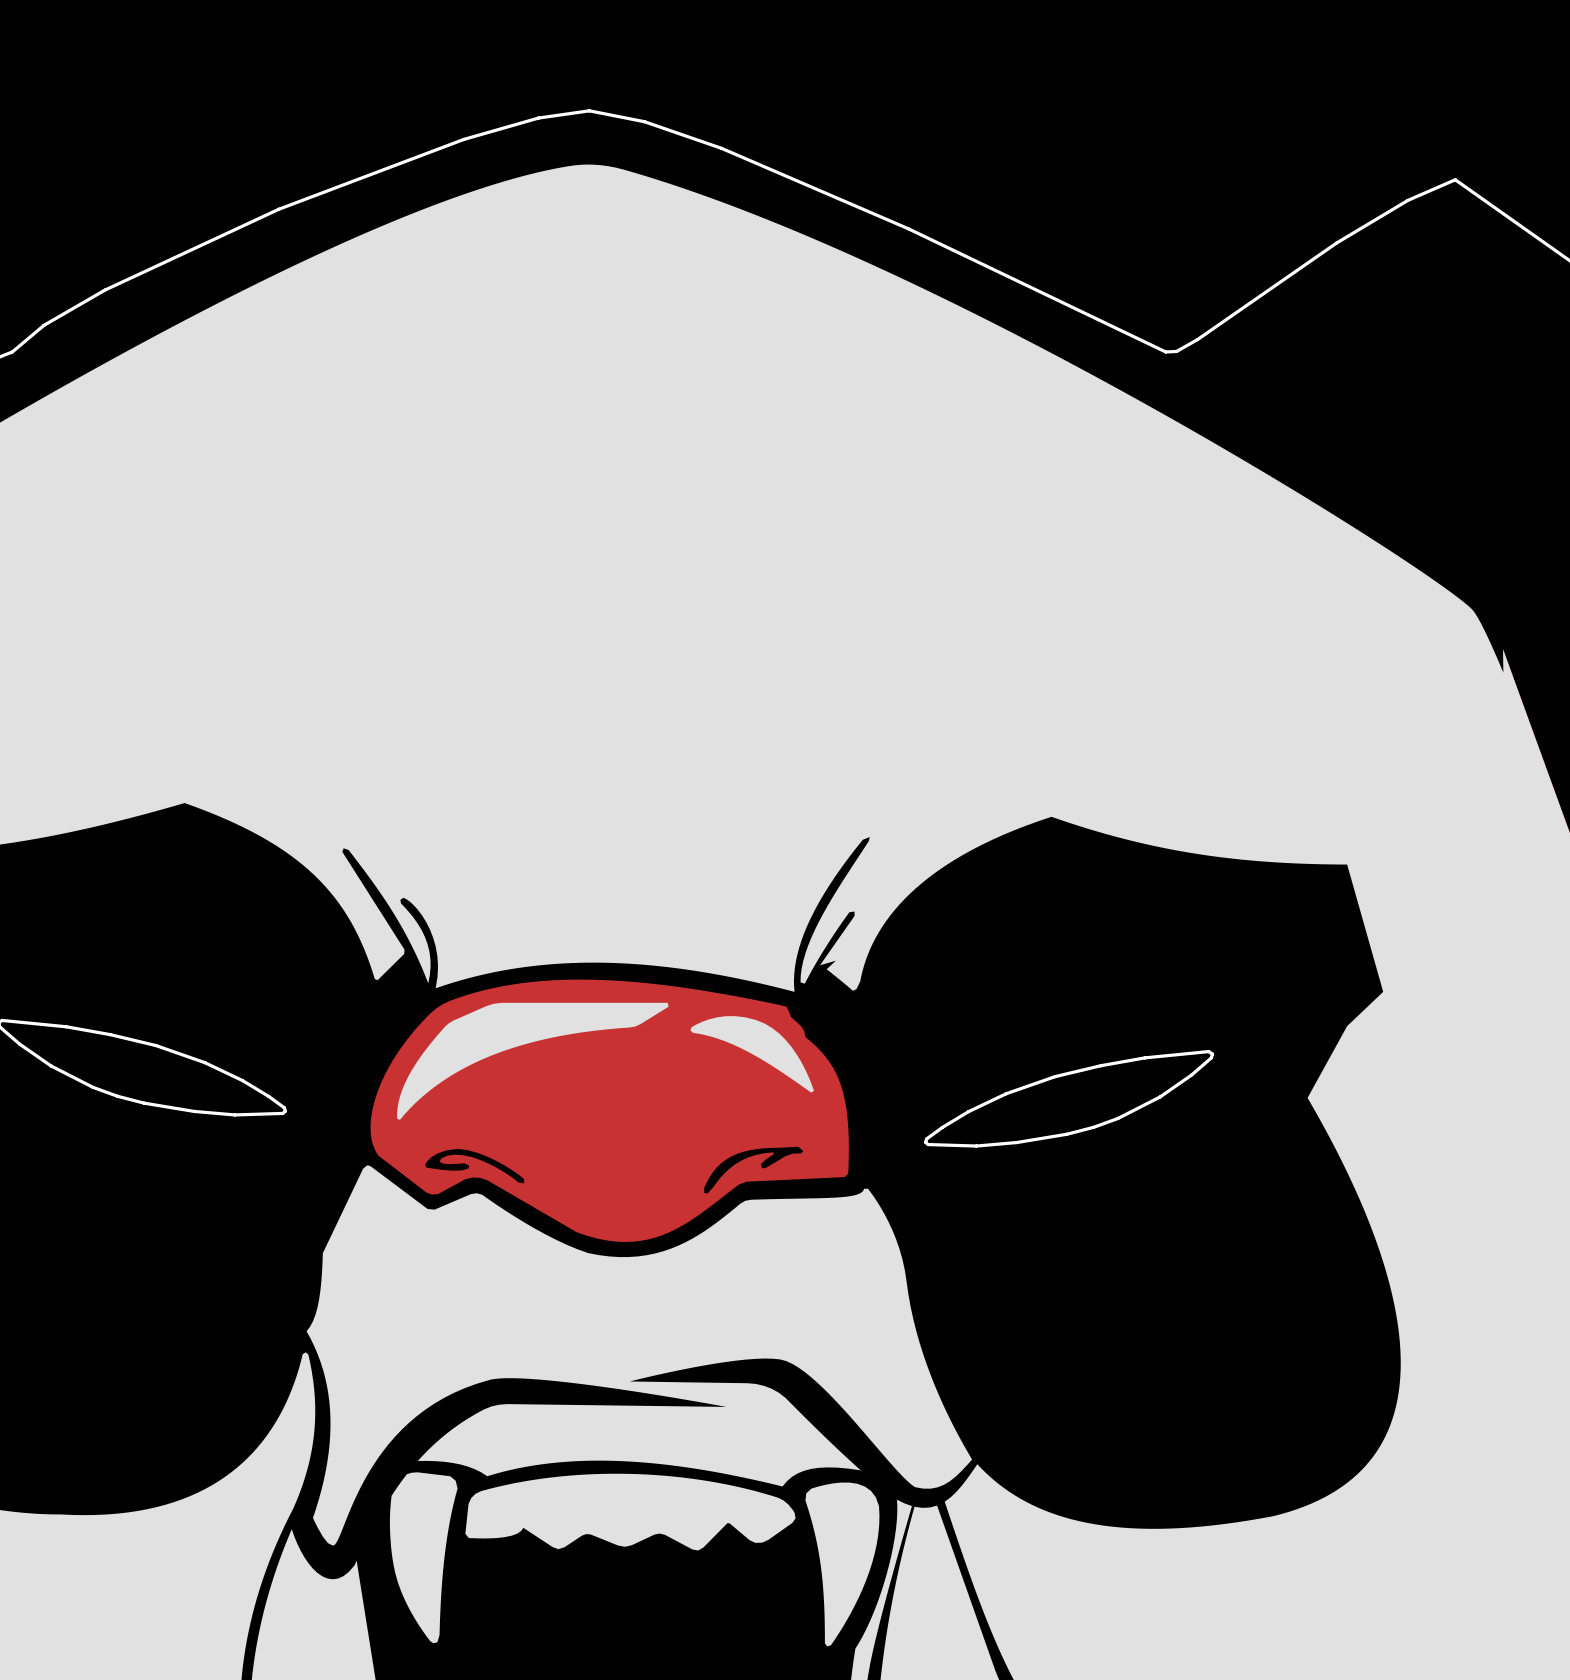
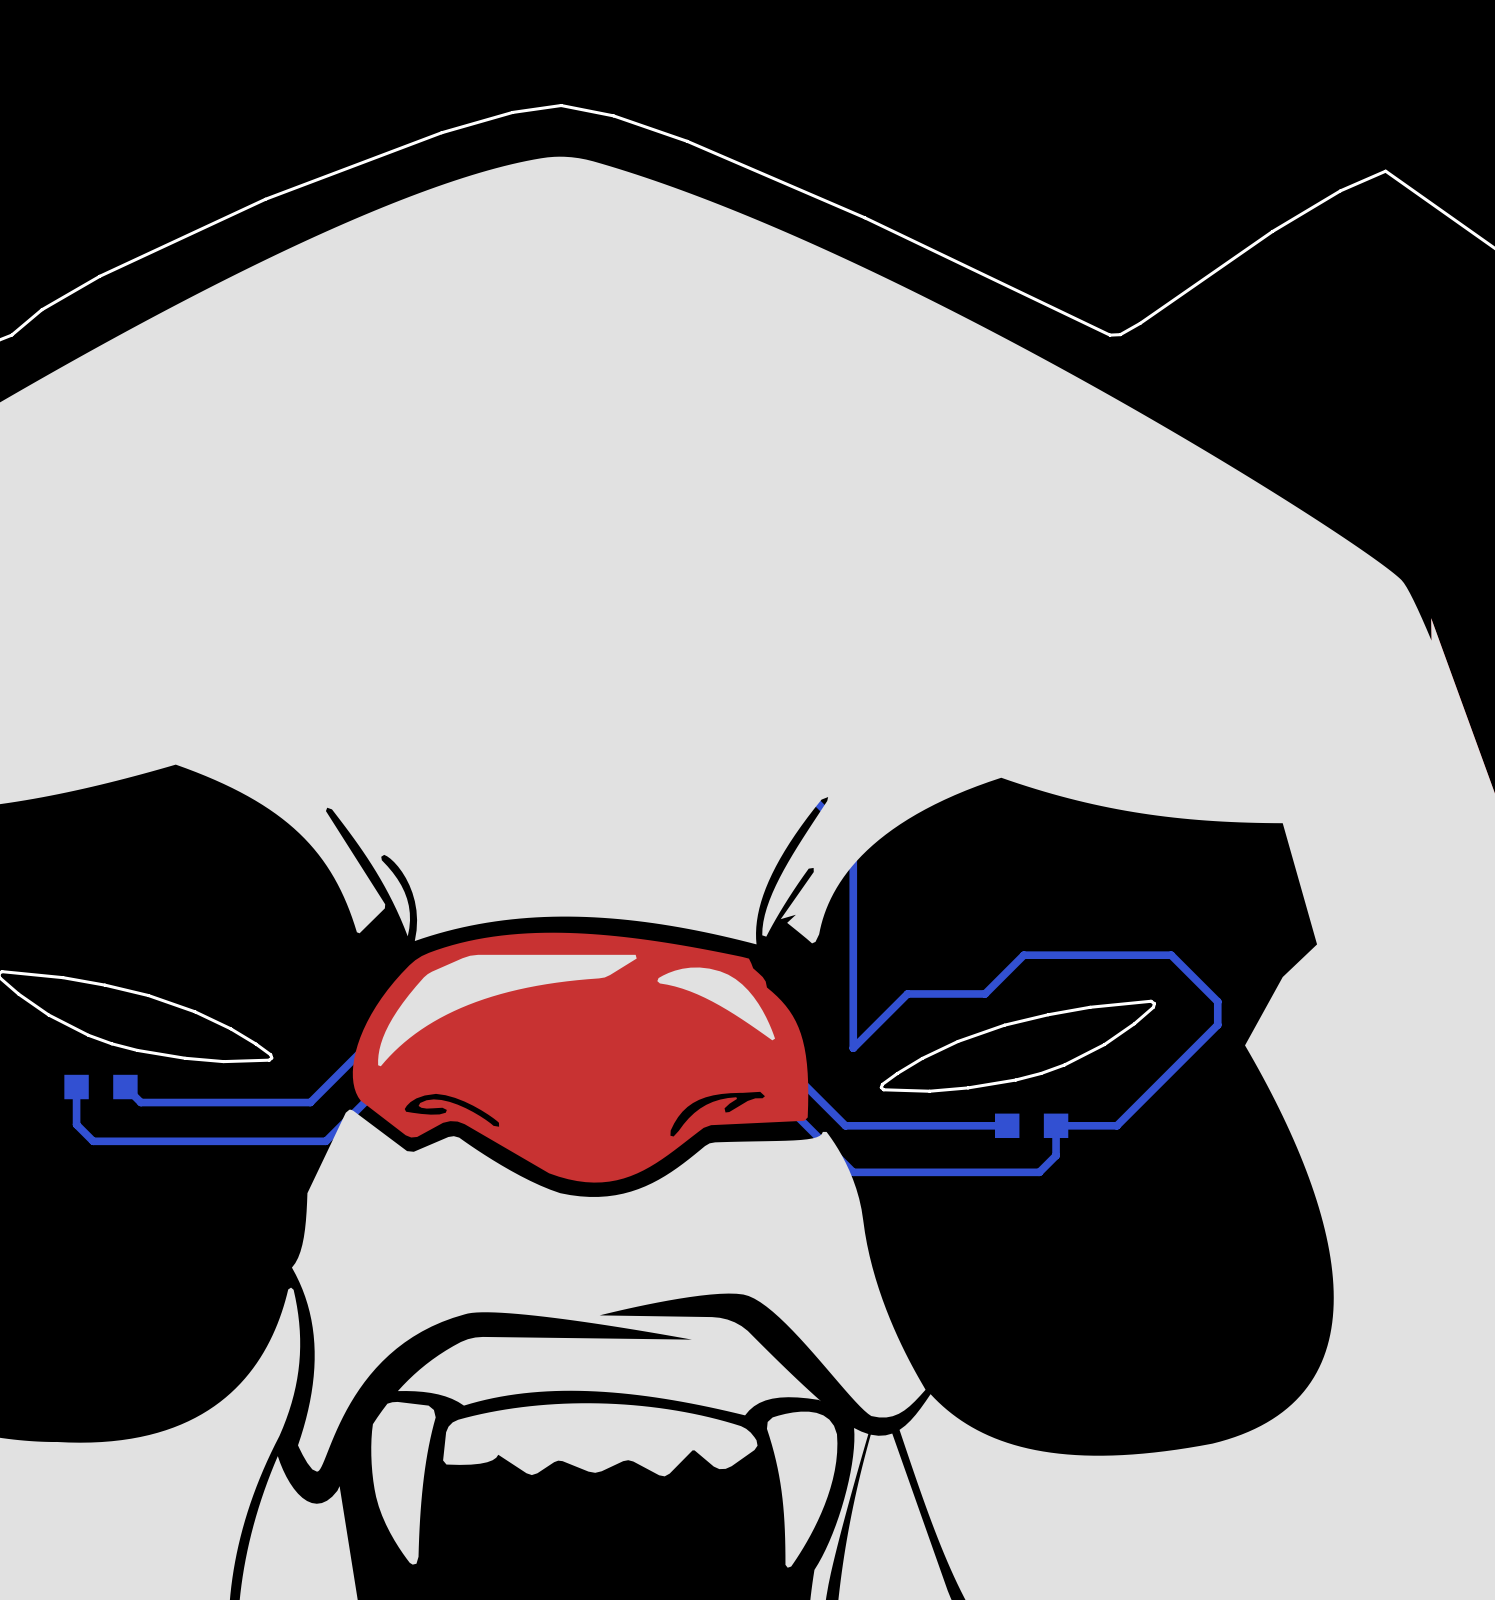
bottom track: none -> (702, 796) (810, 796) (853, 838) (853, 1048) (907, 993) (985, 993) (1023, 955) (1171, 955) (1217, 1001) (1217, 1024) (1116, 1125) (1056, 1125) (1056, 1155) (1039, 1172) (853, 1172) (729, 1048) (418, 1048) (325, 1141) (93, 1141) (76, 1124) (76, 1087)
part: none -> (100, 1087)
bottom track: none -> (125, 1087) (140, 1102) (310, 1102) (419, 993) (737, 993) (752, 978) (752, 1032) (845, 1125) (1007, 1125)
part: none -> (1031, 1125)

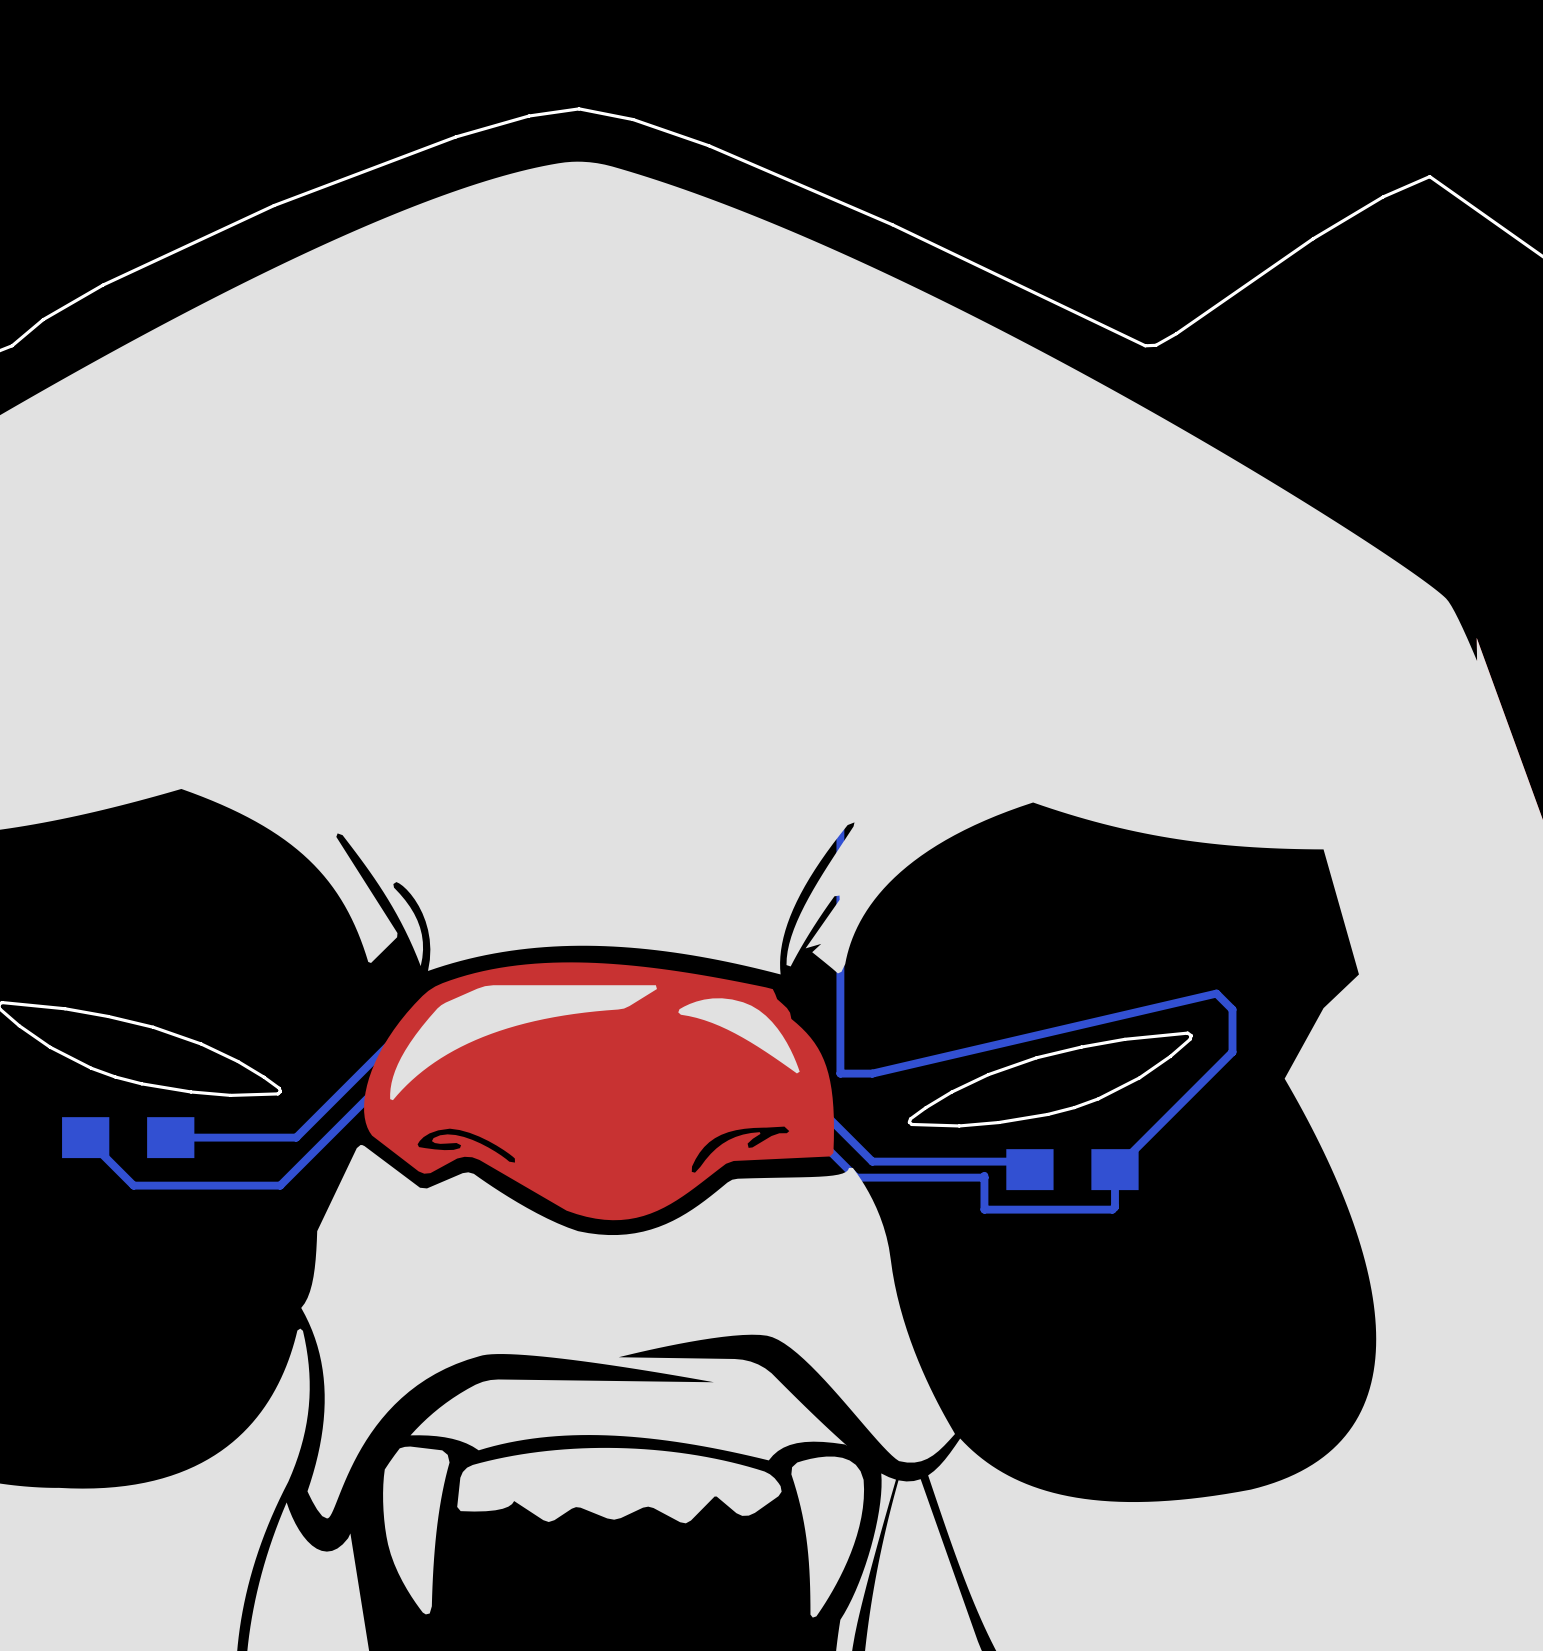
bottom track: (814, 800) (853, 838) (853, 1048) (907, 993) (985, 993) (1023, 955) (1171, 955) (1178, 962) -> (840, 825) (840, 1073) (872, 1073) (1216, 993)
bottom track: (1194, 978) (1217, 1001) (1217, 1024) (1116, 1125) (1056, 1125) (1056, 1155) (1039, 1172) -> (1232, 1009) (1232, 1052) (1114, 1169) (1114, 1207) (1112, 1209) (1072, 1209)
bottom track: (419, 993) (310, 1102) (287, 1102) -> (432, 1025) (408, 1025) (296, 1137)
part footprint: [64, 1074, 138, 1100] -> [62, 1117, 195, 1159]
bottom track: (76, 1087) (76, 1124) (93, 1141) (325, 1141) (418, 1048) (729, 1048) (853, 1172) (954, 1172) -> (984, 1175) (984, 1209)
bottom track: (125, 1087) (140, 1102) (165, 1102) -> none
bottom track: none -> (85, 1137) (133, 1185) (280, 1185) (408, 1057) (736, 1057) (856, 1177) (984, 1177)
part footprint: [994, 1113, 1069, 1139] -> [1006, 1149, 1139, 1191]

